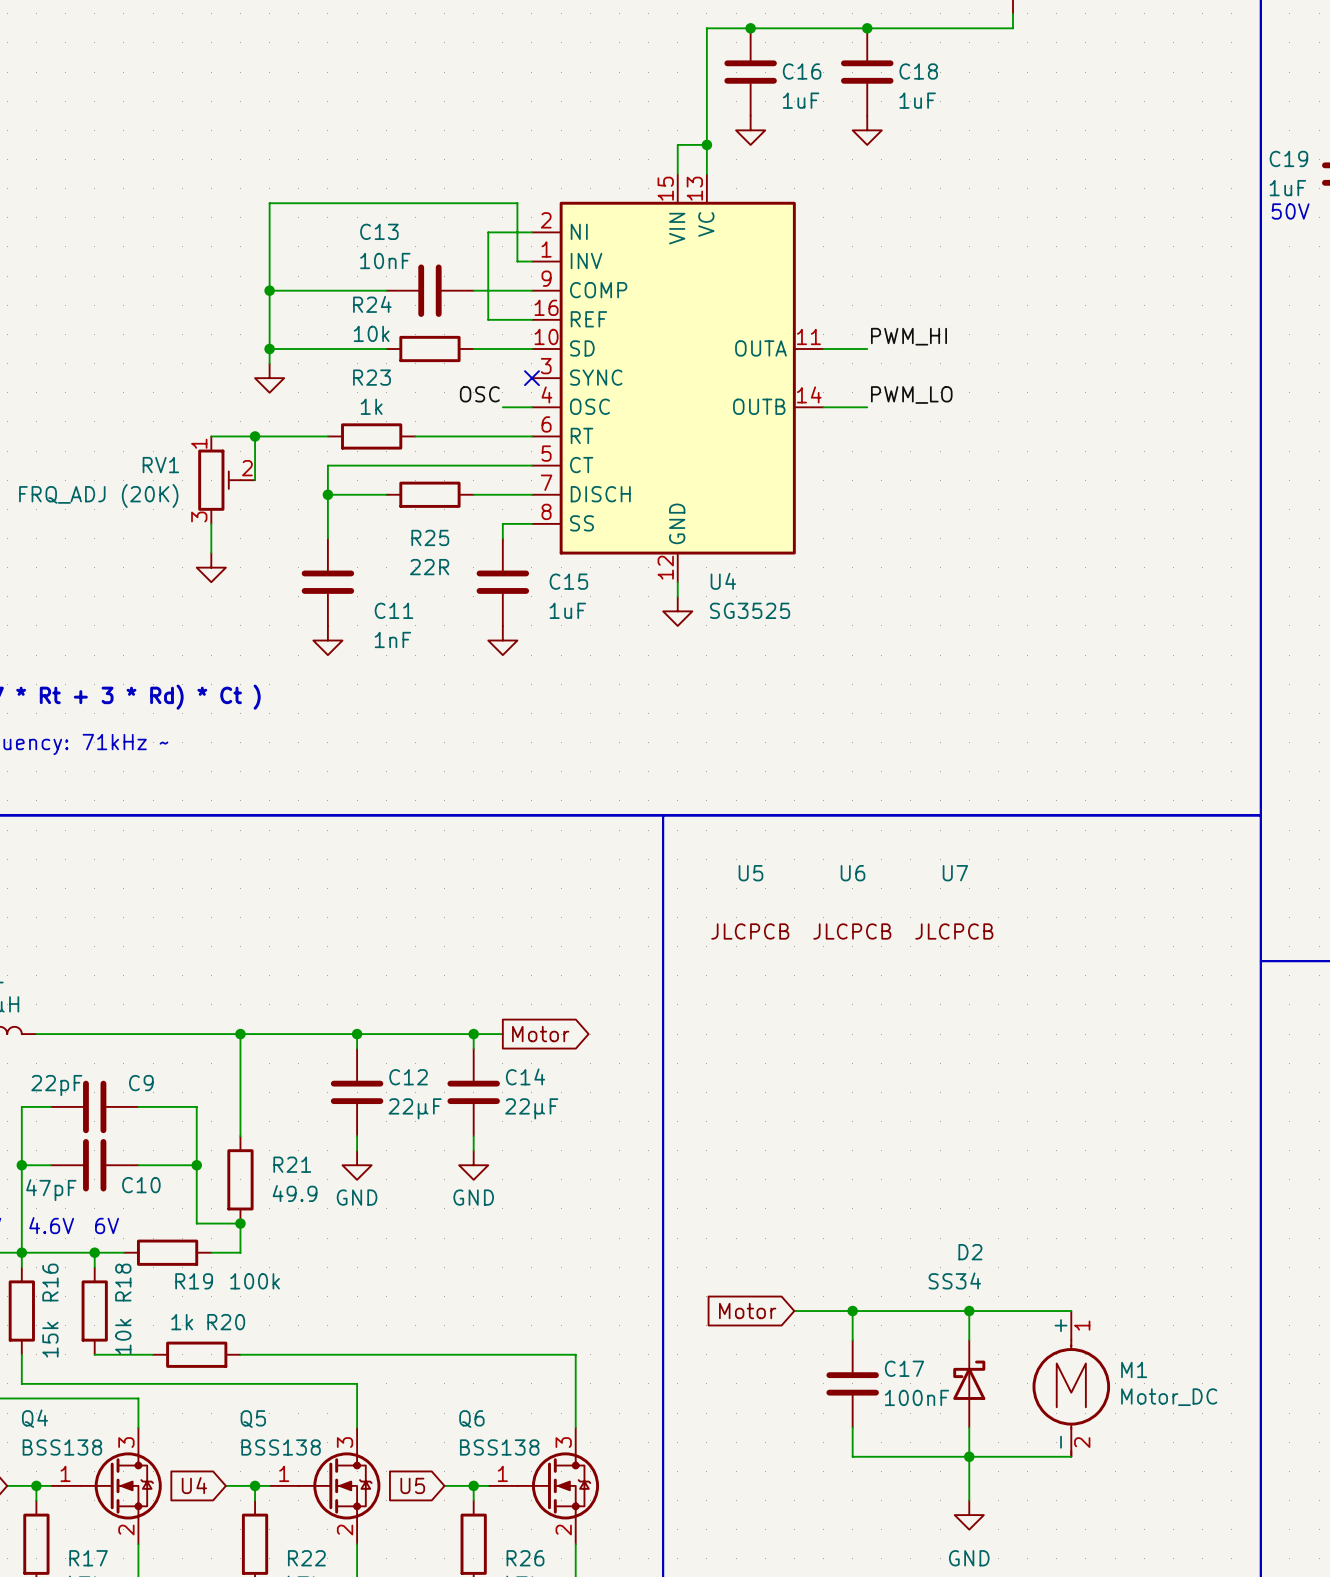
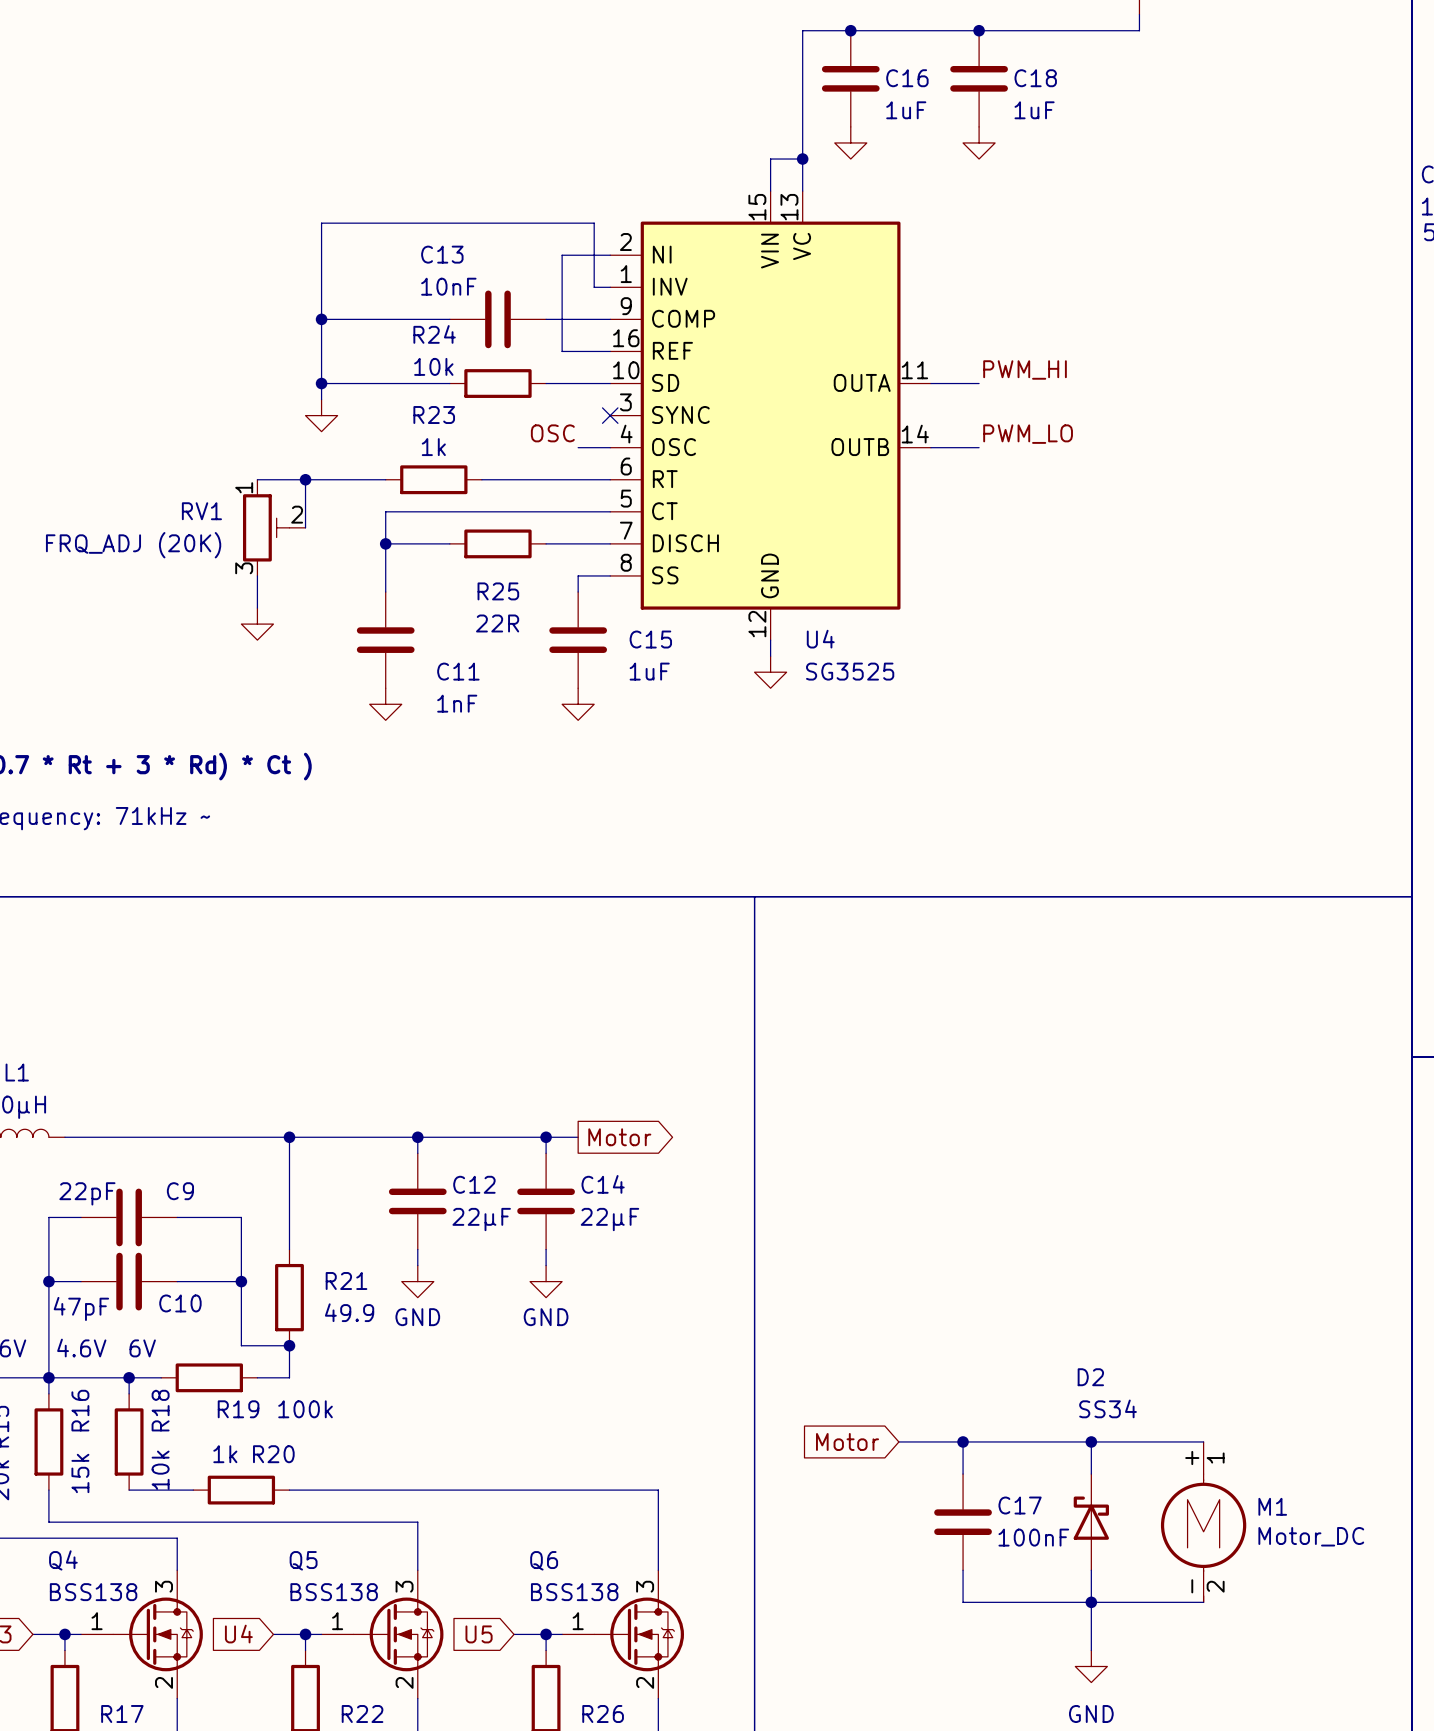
U5: (750, 902) -> none
U6: (852, 902) -> none
U7: (954, 902) -> none
D2 flip: as is (969, 1380) -> left-right (1091, 1518)

